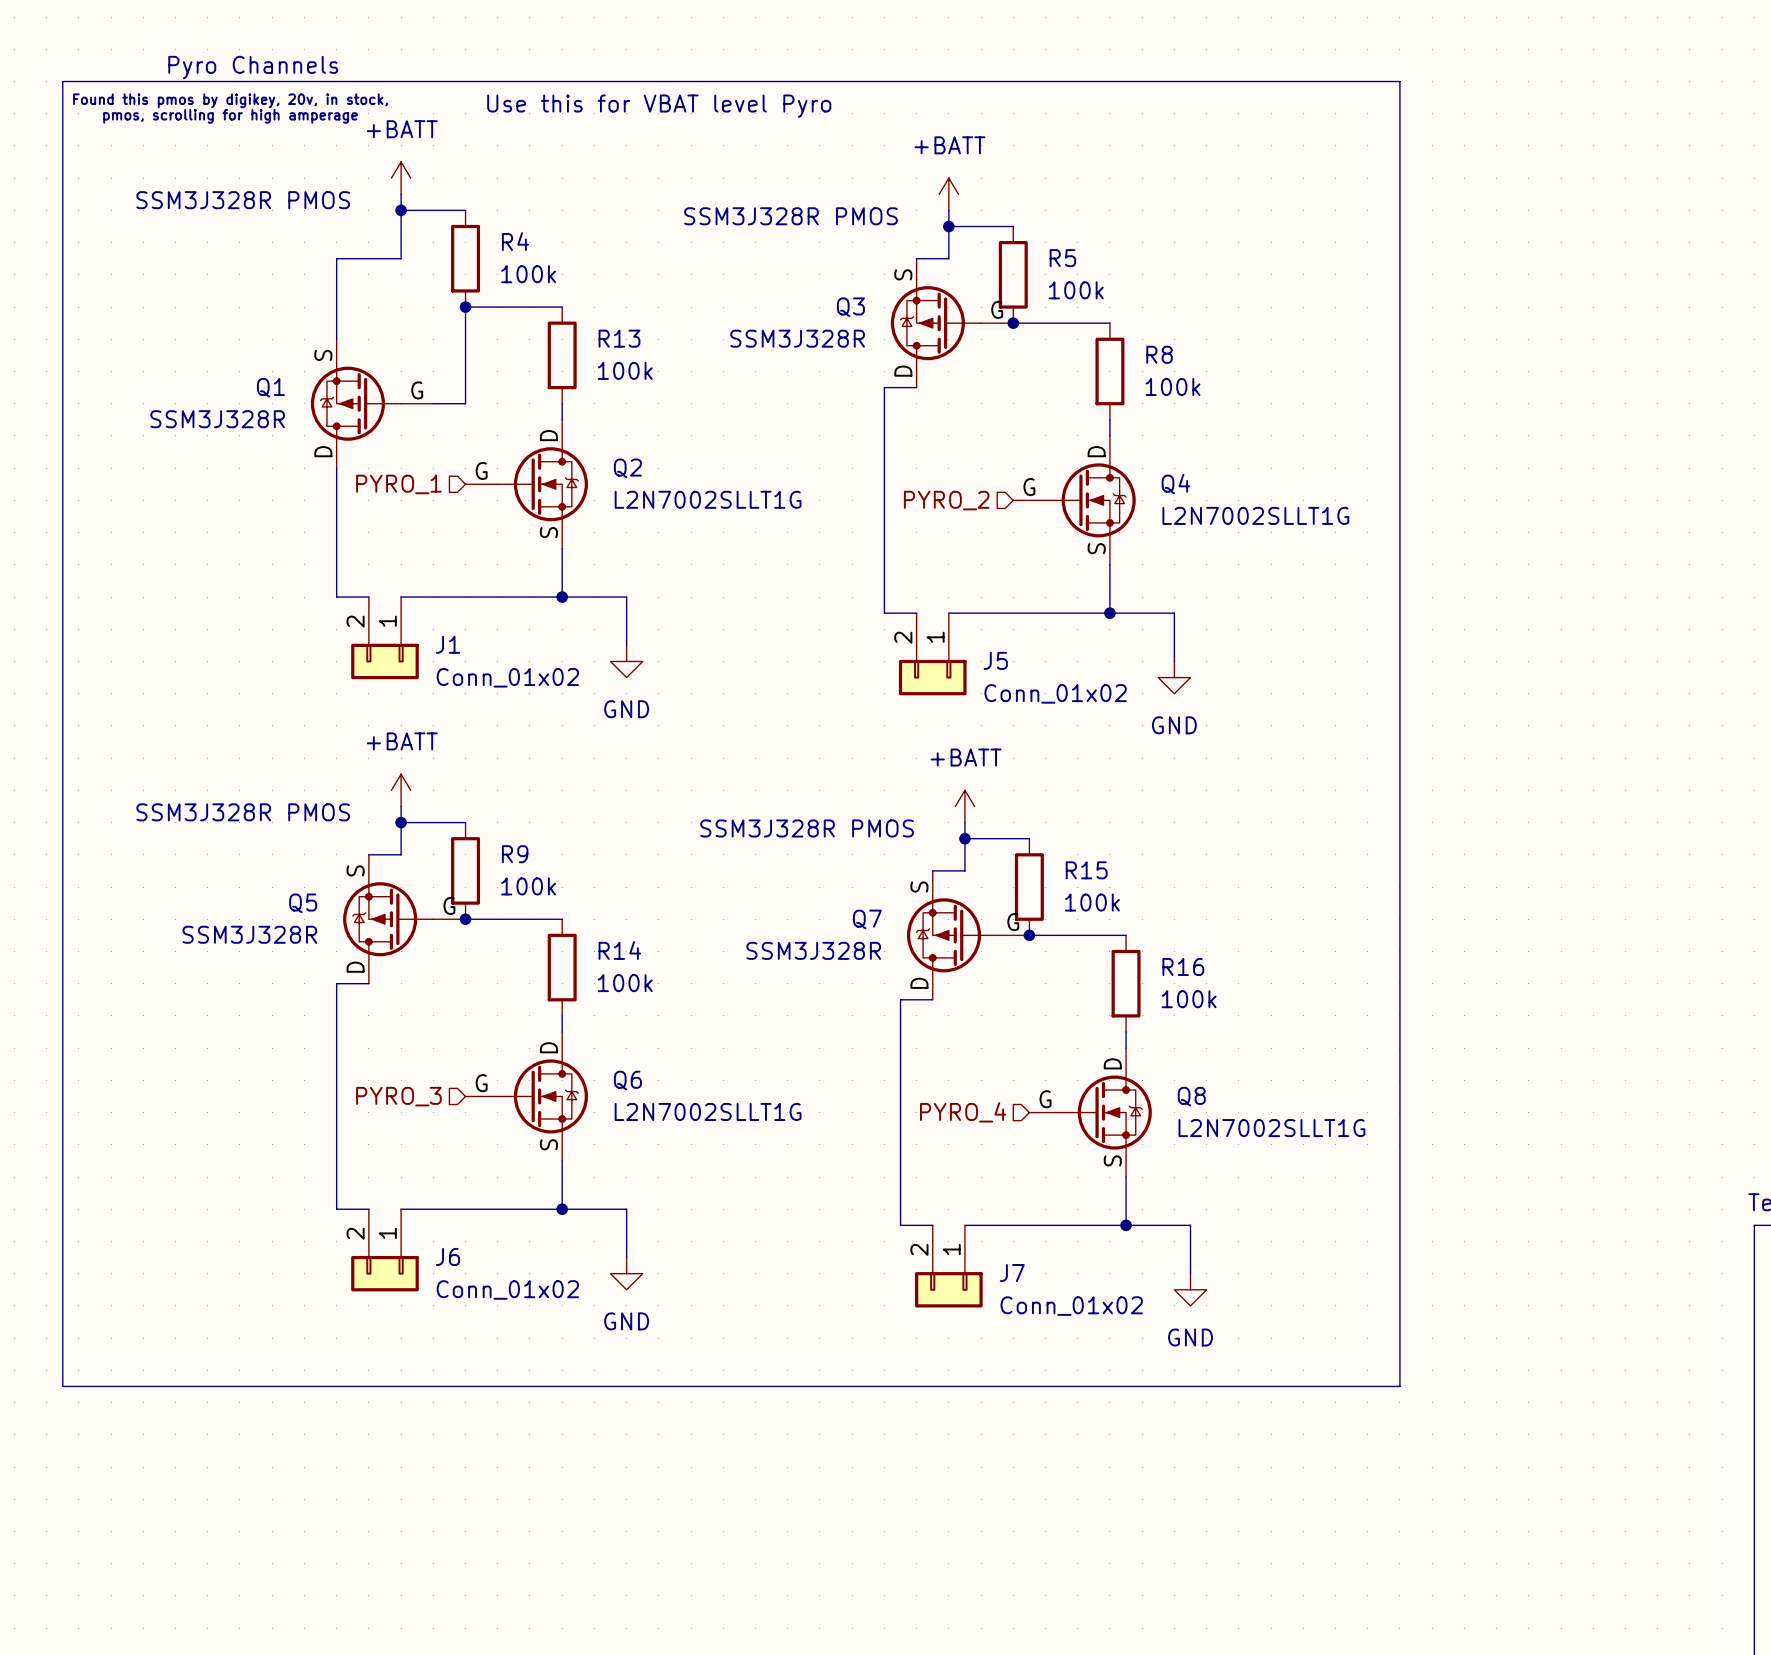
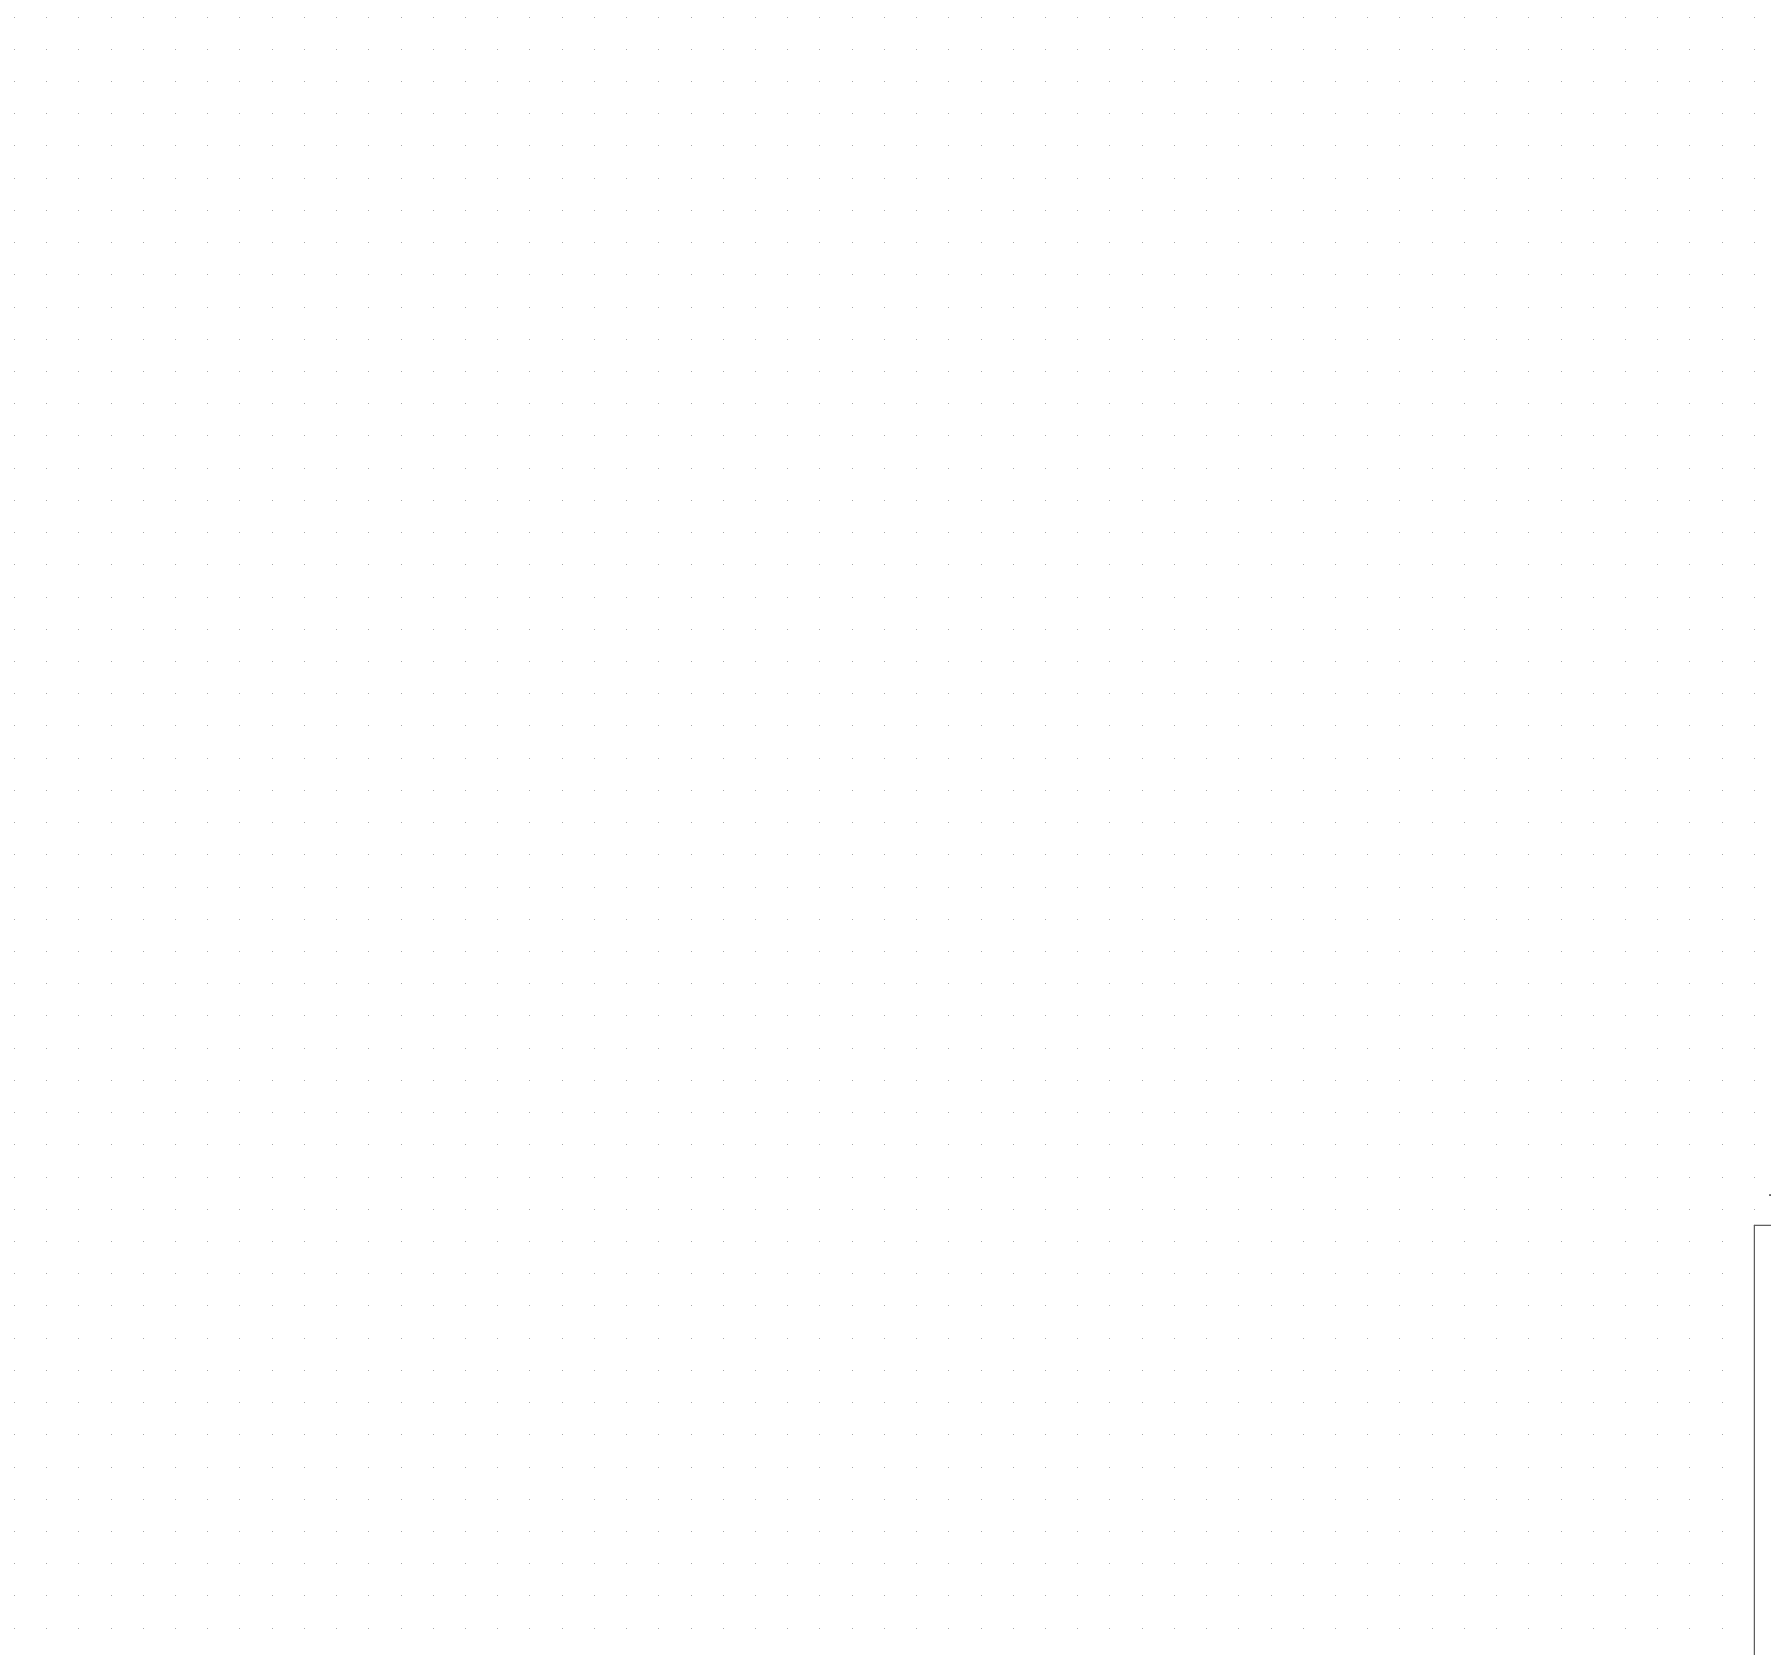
text: Pyro Channels (253, 67) -> none
line: (62, 81) (1399, 81) (1399, 1386) (62, 1386) (62, 81) -> none
text: Found this pmos by digikey, 20v, in stock, (230, 100) -> none
text: Use this for VBAT level Pyro (659, 106) -> none
text: pmos, scrolling for high amperage (230, 116) -> none
power symbol: +BATT (401, 178) -> none
wire: (401, 194) (401, 258) (336, 258) (336, 339) -> none
power symbol: +BATT (948, 194) -> none
text: SSM3J328R PMOS (243, 200) -> none
wire: (401, 210) (465, 210) -> none
junction: (401, 210) -> none
wire: (948, 210) (948, 258) (916, 258) -> none
text: SSM3J328R PMOS (790, 216) -> none
wire: (948, 226) (1013, 226) -> none
junction: (948, 226) -> none
R4: 100k (465, 258) -> none
R5: 100k (1013, 274) -> none
junction: (465, 307) -> none
wire: (562, 307) (465, 307) (465, 403) (433, 403) -> none
Q3: SSM3J328R (952, 323) -> none
wire: (1013, 323) (1109, 323) -> none
junction: (1013, 323) -> none
R13: 100k (562, 355) -> none
R8: 100k (1109, 371) -> none
wire: (916, 387) (884, 387) (884, 613) (916, 613) -> none
Q1: SSM3J328R (372, 403) -> none
wire: (562, 403) (562, 419) -> none
wire: (1109, 419) (1109, 435) -> none
wire: (336, 468) (336, 597) (368, 597) -> none
hierarchical label: PYRO_1 (398, 484) -> none
Q2: L2N7002SLLT1G (526, 484) -> none
hierarchical label: PYRO_2 (946, 500) -> none
Q4: L2N7002SLLT1G (1074, 500) -> none
wire: (562, 548) (562, 597) -> none
wire: (1109, 564) (1109, 613) -> none
wire: (401, 597) (626, 597) (626, 645) -> none
junction: (562, 597) -> none
wire: (948, 613) (1174, 613) (1174, 661) -> none
junction: (1109, 613) -> none
J1: Conn_01x02 (384, 638) -> none
J5: Conn_01x02 (932, 654) -> none
power symbol: GND (626, 661) -> none
power symbol: GND (1174, 677) -> none
power symbol: +BATT (401, 790) -> none
wire: (401, 806) (401, 854) (368, 854) -> none
power symbol: +BATT (964, 806) -> none
text: SSM3J328R PMOS (243, 812) -> none
wire: (401, 822) (465, 822) -> none
junction: (401, 822) -> none
wire: (964, 822) (964, 870) (932, 870) -> none
text: SSM3J328R PMOS (807, 828) -> none
wire: (964, 838) (1029, 838) -> none
junction: (964, 838) -> none
R9: 100k (465, 870) -> none
R15: 100k (1029, 887) -> none
Q5: SSM3J328R (404, 919) -> none
wire: (465, 919) (562, 919) -> none
junction: (465, 919) -> none
Q7: SSM3J328R (968, 935) -> none
wire: (1029, 935) (1126, 935) -> none
junction: (1029, 935) -> none
R14: 100k (562, 967) -> none
wire: (368, 983) (336, 983) (336, 1209) (368, 1209) -> none
R16: 100k (1126, 983) -> none
wire: (932, 999) (900, 999) (900, 1225) (932, 1225) -> none
wire: (562, 1015) (562, 1032) -> none
wire: (1126, 1032) (1126, 1048) -> none
hierarchical label: PYRO_3 (398, 1096) -> none
Q6: L2N7002SLLT1G (526, 1096) -> none
hierarchical label: PYRO_4 (963, 1112) -> none
Q8: L2N7002SLLT1G (1090, 1112) -> none
wire: (562, 1160) (562, 1209) -> none
wire: (1126, 1177) (1126, 1225) -> none
wire: (401, 1209) (626, 1209) (626, 1257) -> none
junction: (562, 1209) -> none
wire: (964, 1225) (1190, 1225) (1190, 1273) -> none
junction: (1126, 1225) -> none
J6: Conn_01x02 (384, 1250) -> none
J7: Conn_01x02 (948, 1266) -> none
power symbol: GND (626, 1273) -> none
power symbol: GND (1190, 1289) -> none

